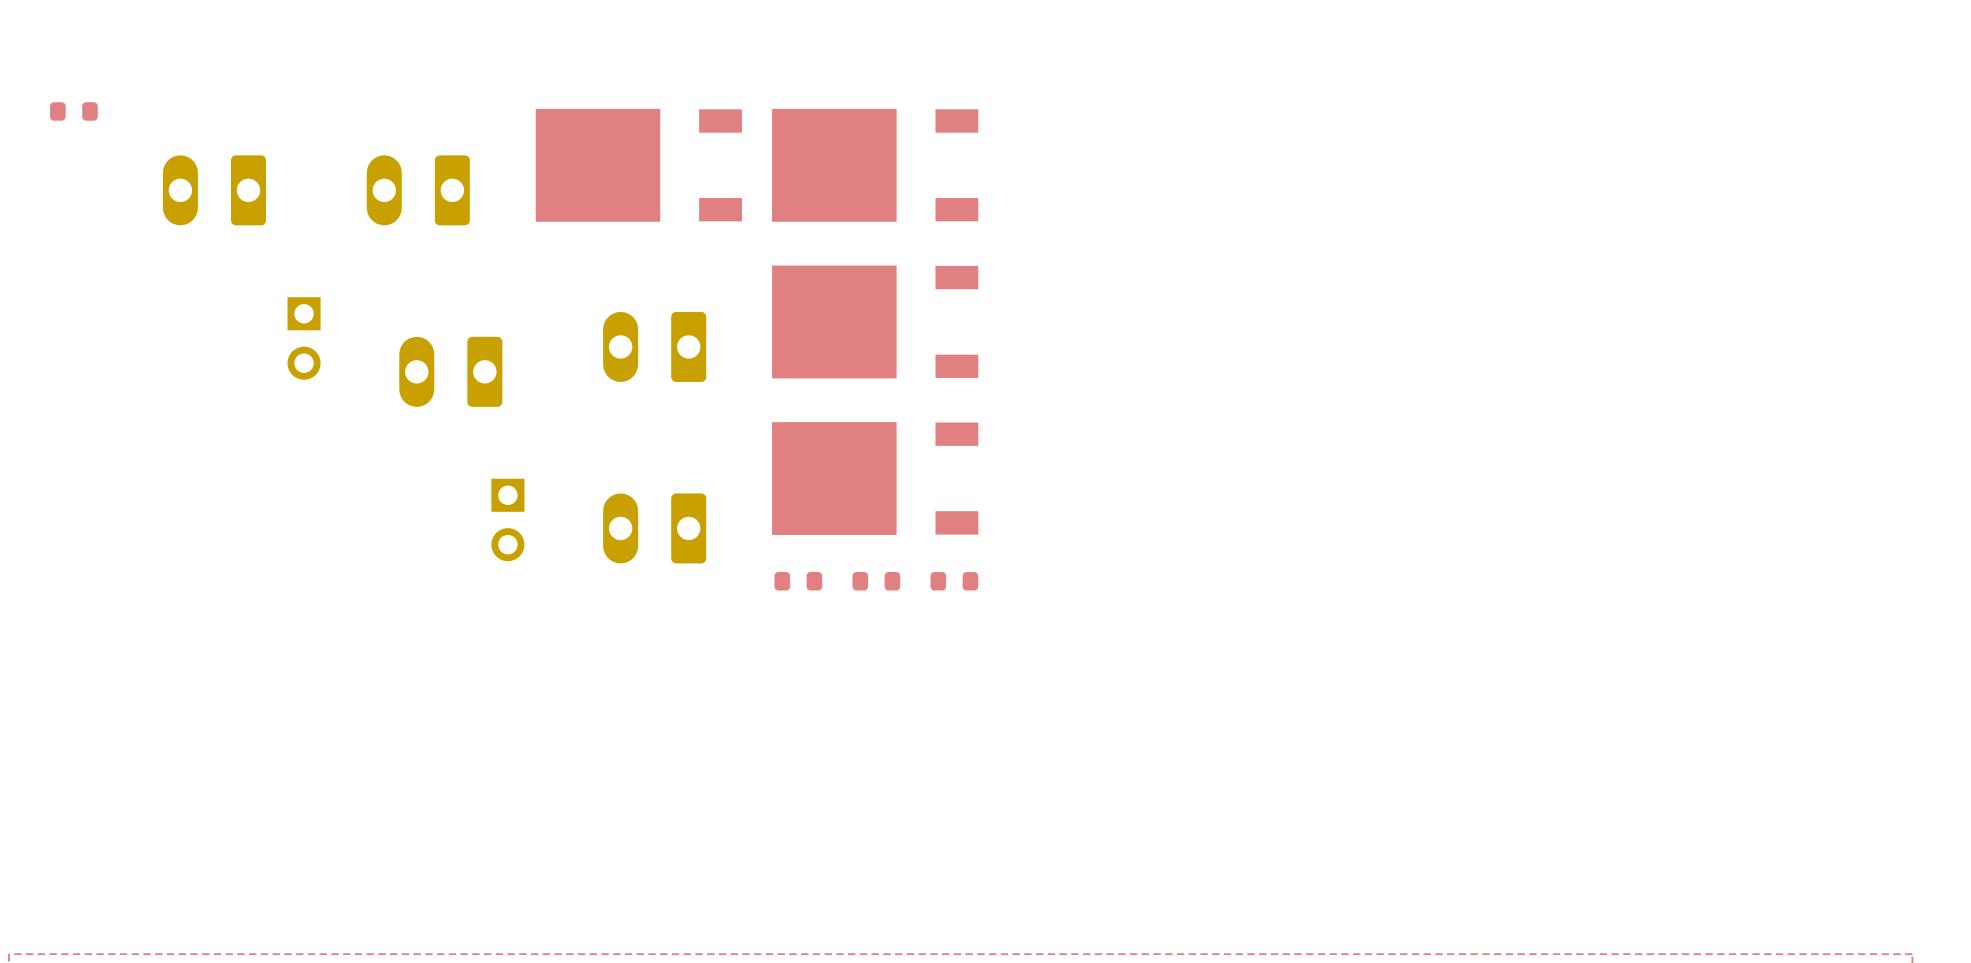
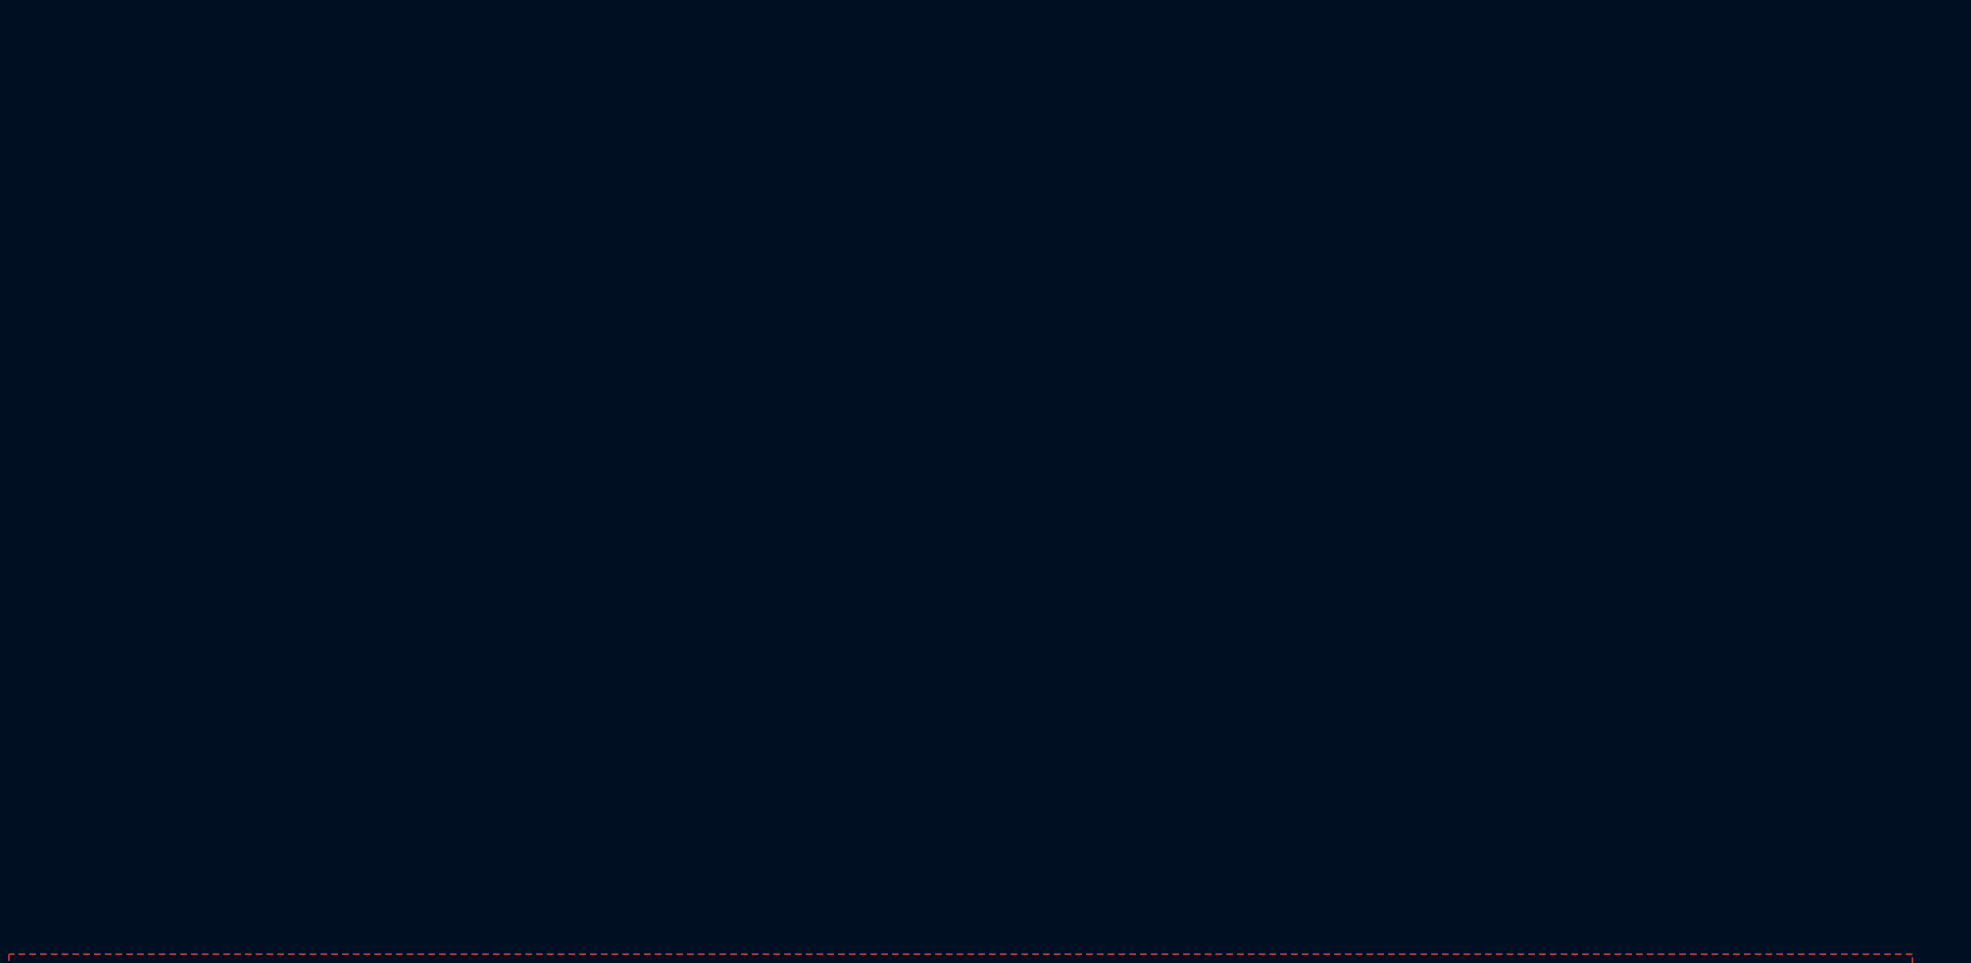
part: (73, 111) -> none
part: (638, 165) -> none
part: (875, 165) -> none
part: (214, 190) -> none
part: (418, 190) -> none
part: (875, 321) -> none
part: (304, 338) -> none
part: (654, 346) -> none
part: (450, 371) -> none
part: (875, 478) -> none
part: (507, 519) -> none
part: (654, 528) -> none
part: (798, 581) -> none
part: (876, 581) -> none
part: (954, 581) -> none

